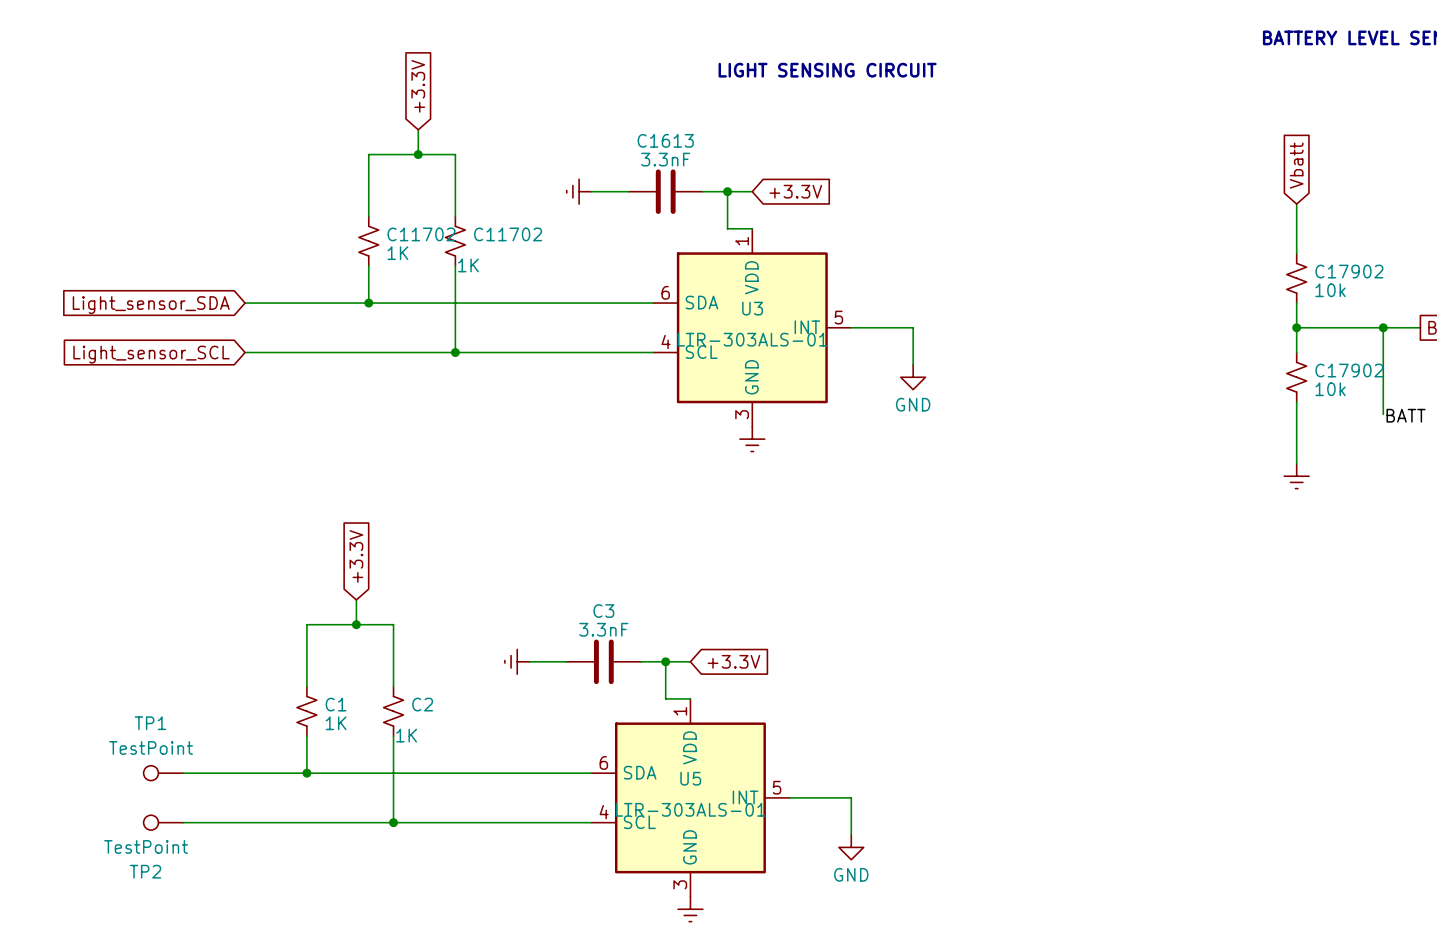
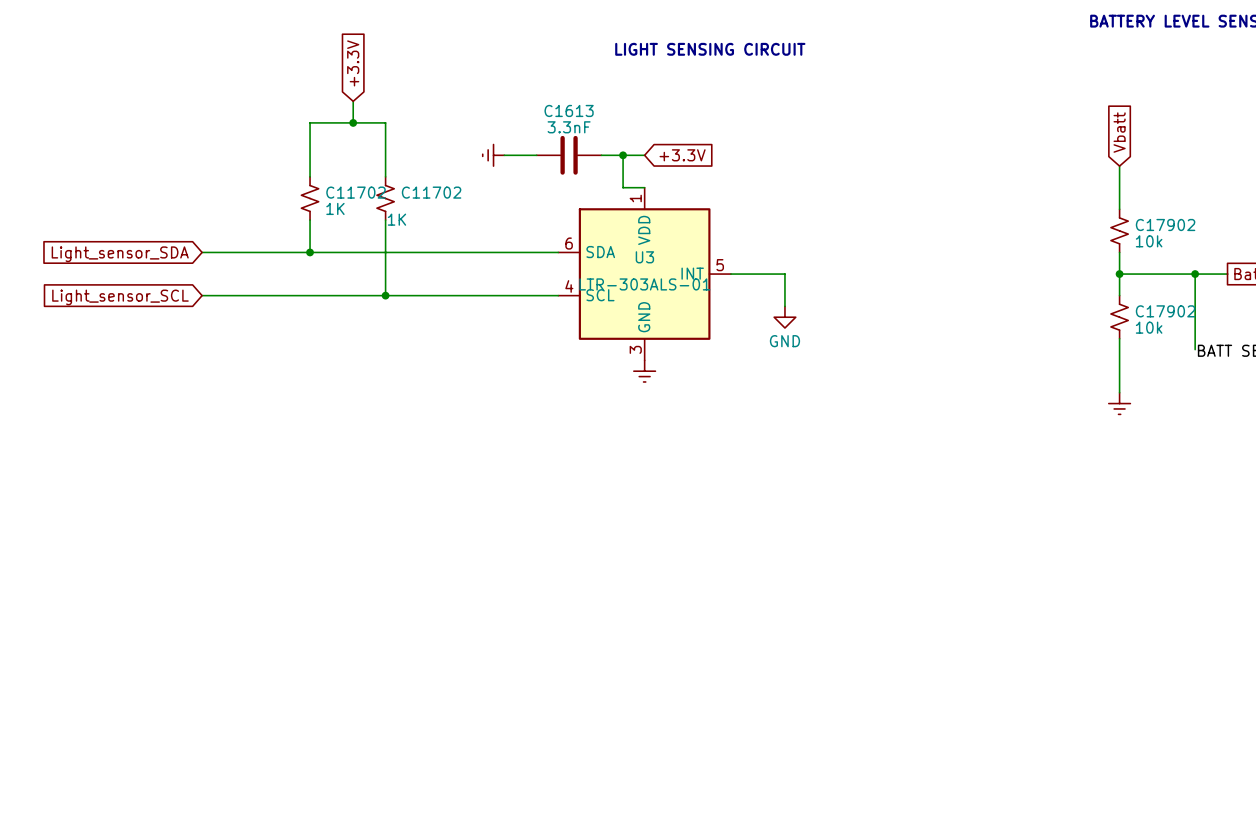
global label: +3.3V (356, 556) -> none
wire: (356, 599) (356, 624) -> none
junction: (356, 624) -> none
power symbol: (517, 661) -> none
wire: (529, 661) (566, 661) -> none
C3: 3.3nF (603, 661) -> none
wire: (640, 661) (690, 661) -> none
wire: (665, 661) (665, 698) (690, 698) -> none
junction: (665, 661) -> none
global label: +3.3V (733, 661) -> none
wire: (306, 686) (306, 624) (393, 624) (393, 686) -> none
C1: 1K (306, 711) -> none
C2: 1K (393, 711) -> none
wire: (306, 736) (306, 773) -> none
wire: (393, 736) (393, 822) -> none
TP1: TestPoint (163, 773) -> none
wire: (183, 773) (591, 773) -> none
junction: (306, 773) -> none
U5: LTR-303ALS-01 (690, 797) -> none
wire: (789, 797) (851, 797) (851, 835) -> none
TP2: TestPoint (163, 822) -> none
wire: (183, 822) (591, 822) -> none
junction: (393, 822) -> none
power symbol: GND (851, 847) -> none
power symbol: (690, 909) -> none

